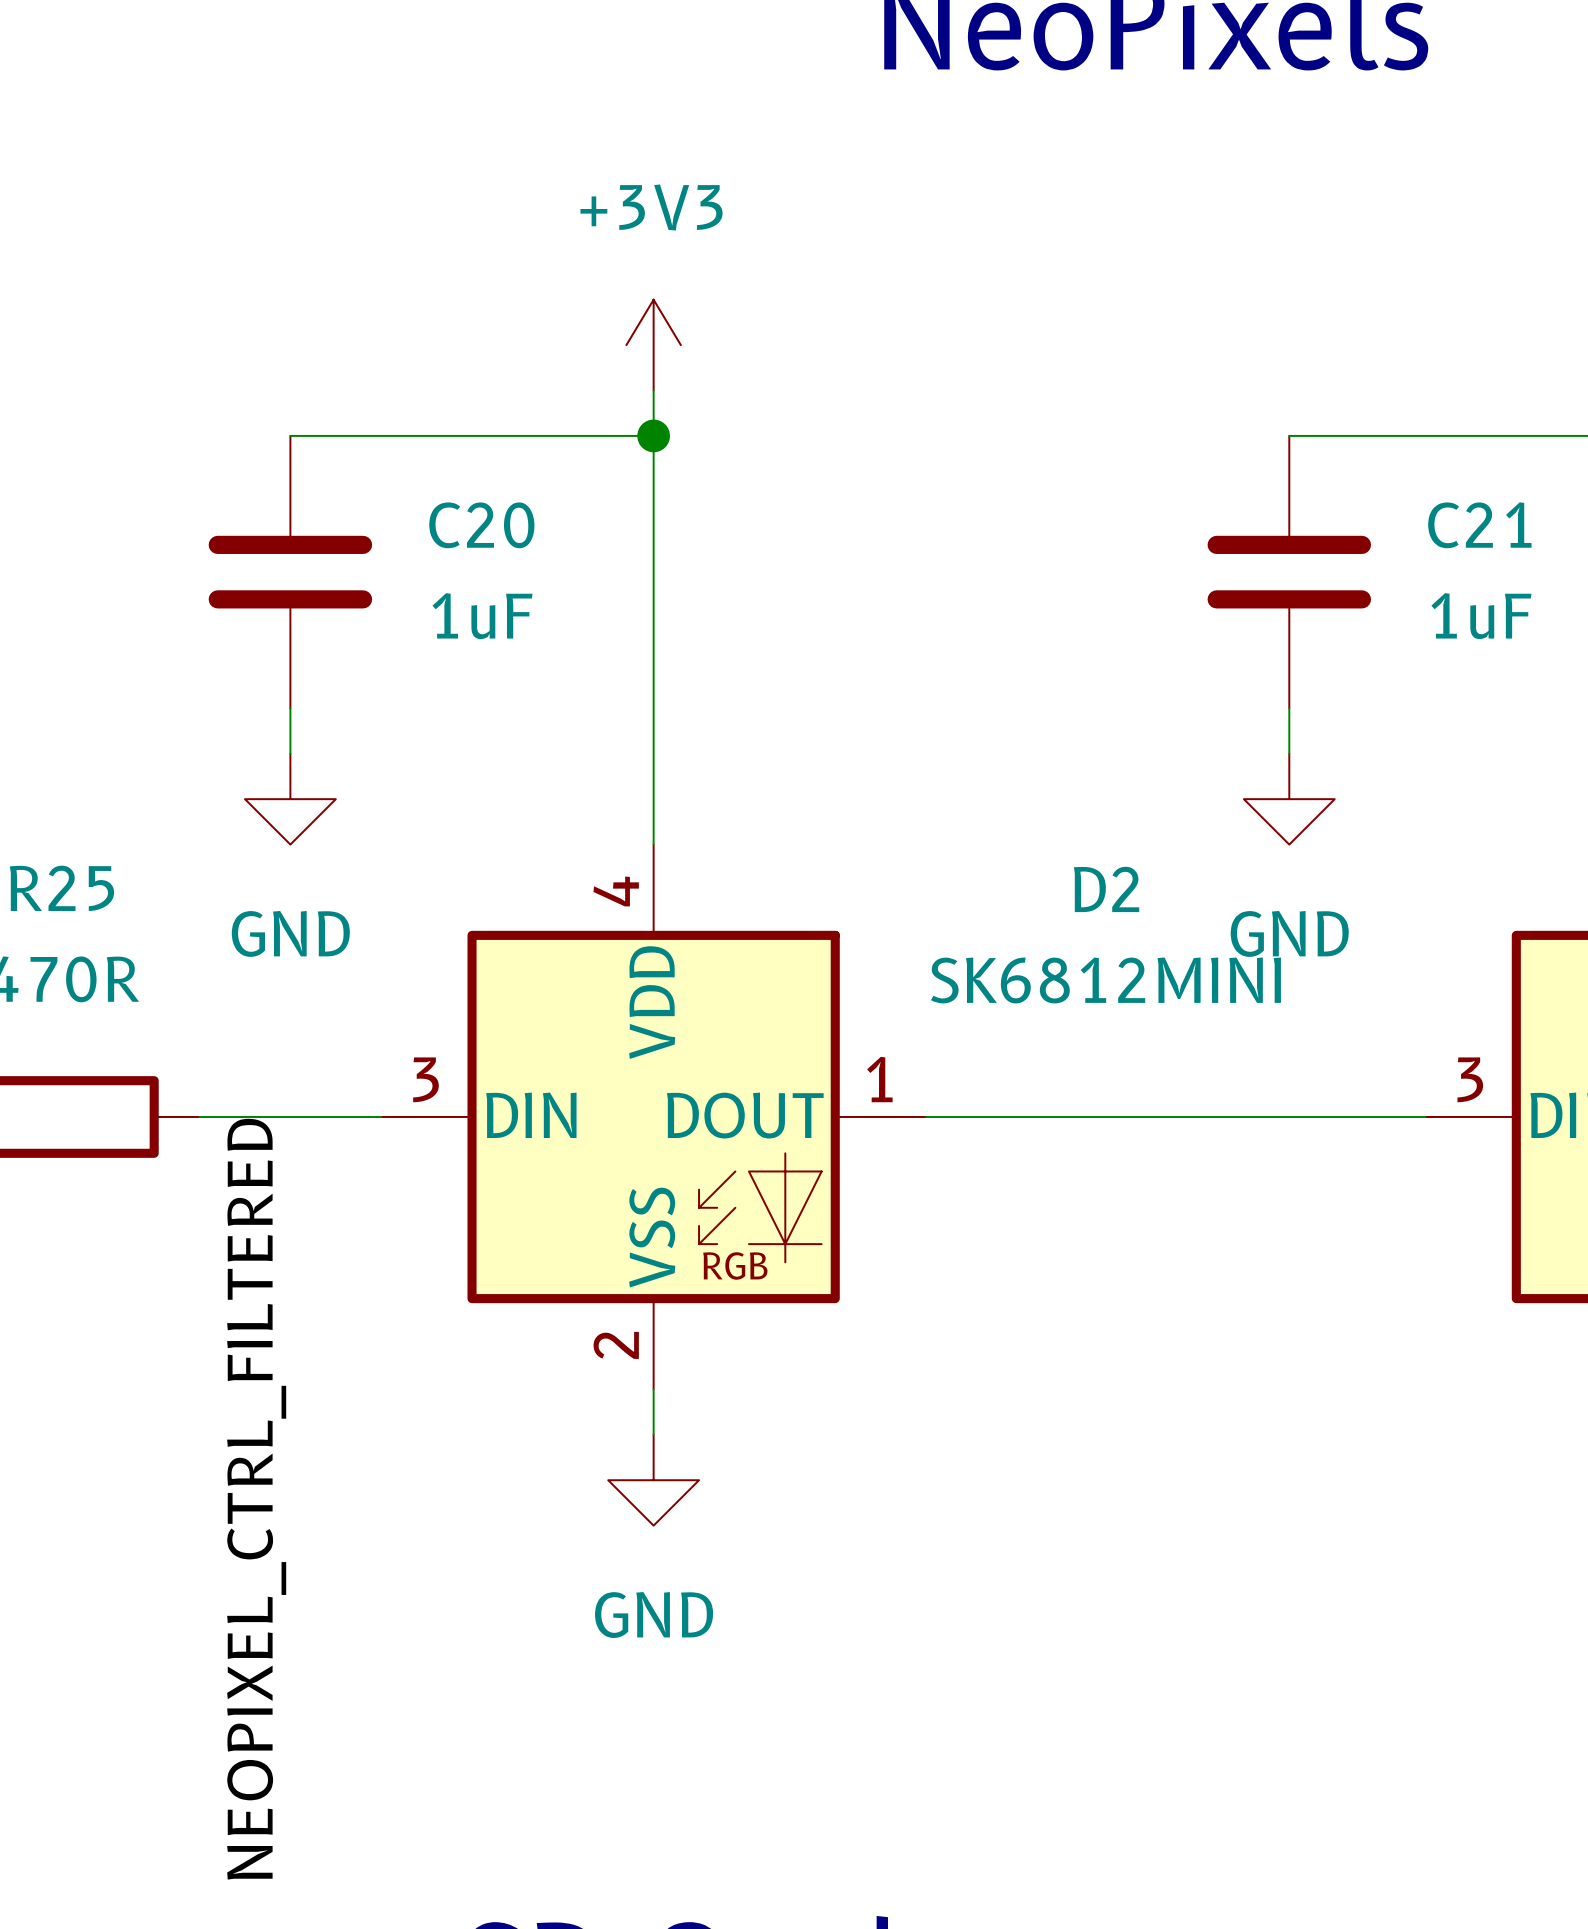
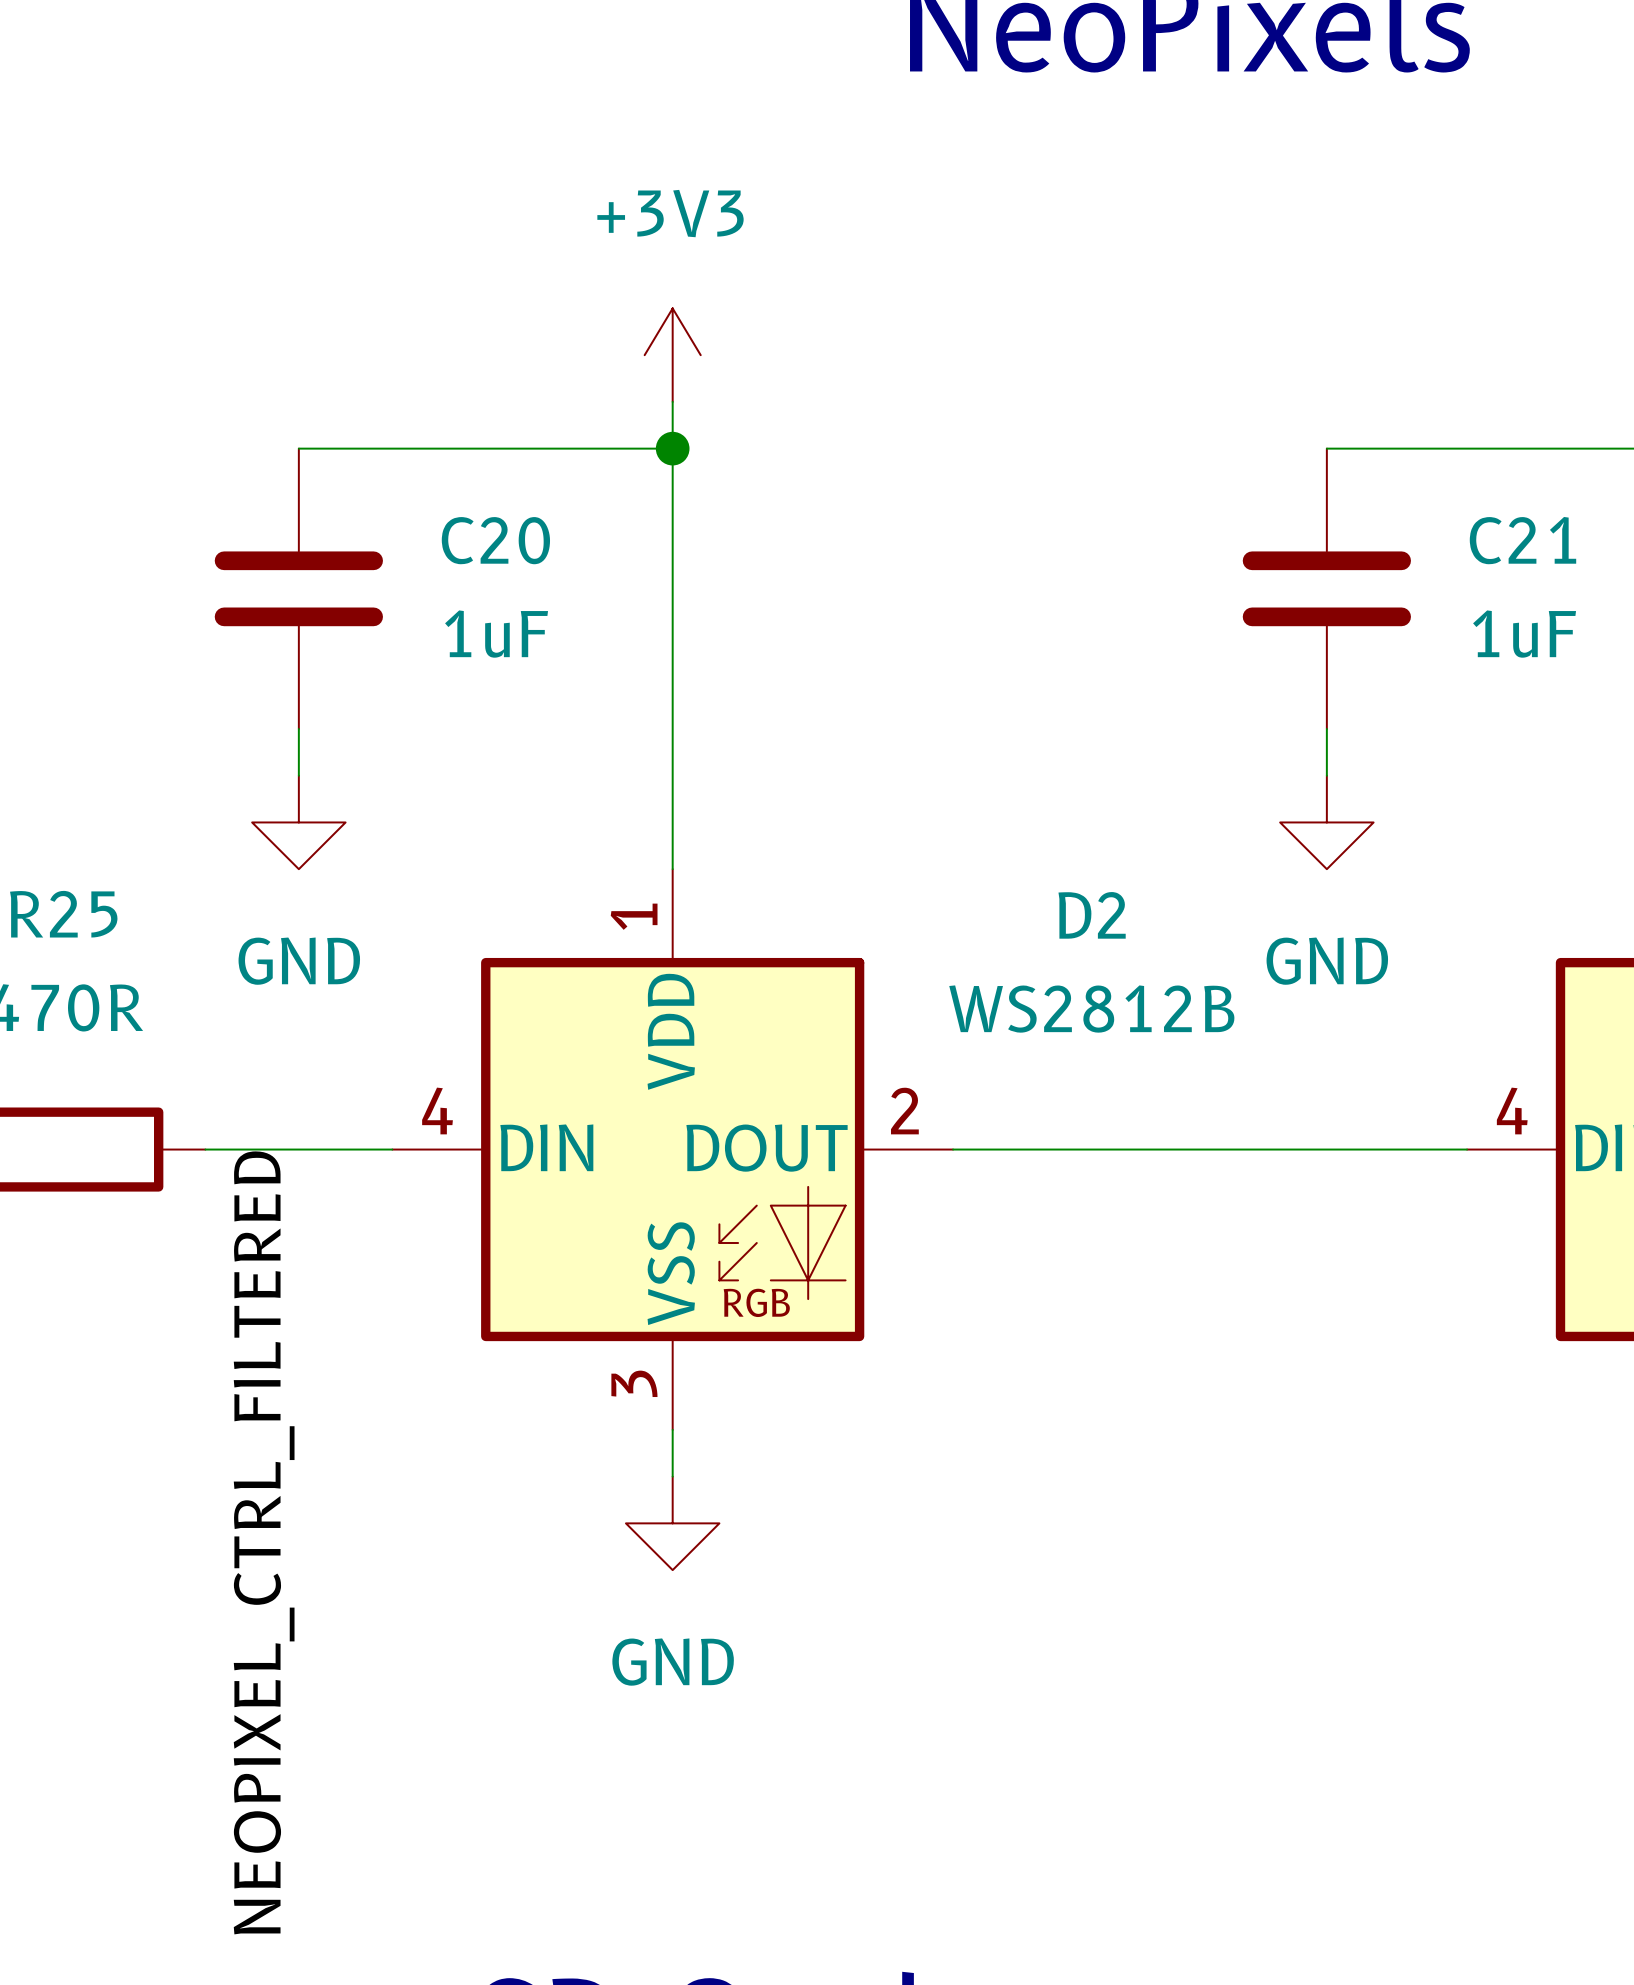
D2 name position: D2 (1106, 889) -> D2 (1092, 915)
D2 pin number: 4 (616, 891) -> 1 (634, 916)
D2 value: SK6812MINI (1105, 980) -> WS2812B (1091, 1009)
D2 pin number: 3 (425, 1079) -> 4 (437, 1111)
D2 pin number: 1 (879, 1079) -> 2 (904, 1111)
part pin number: 3 (1470, 1079) -> 4 (1512, 1111)
D2 pin number: 2 (616, 1345) -> 3 (634, 1383)

